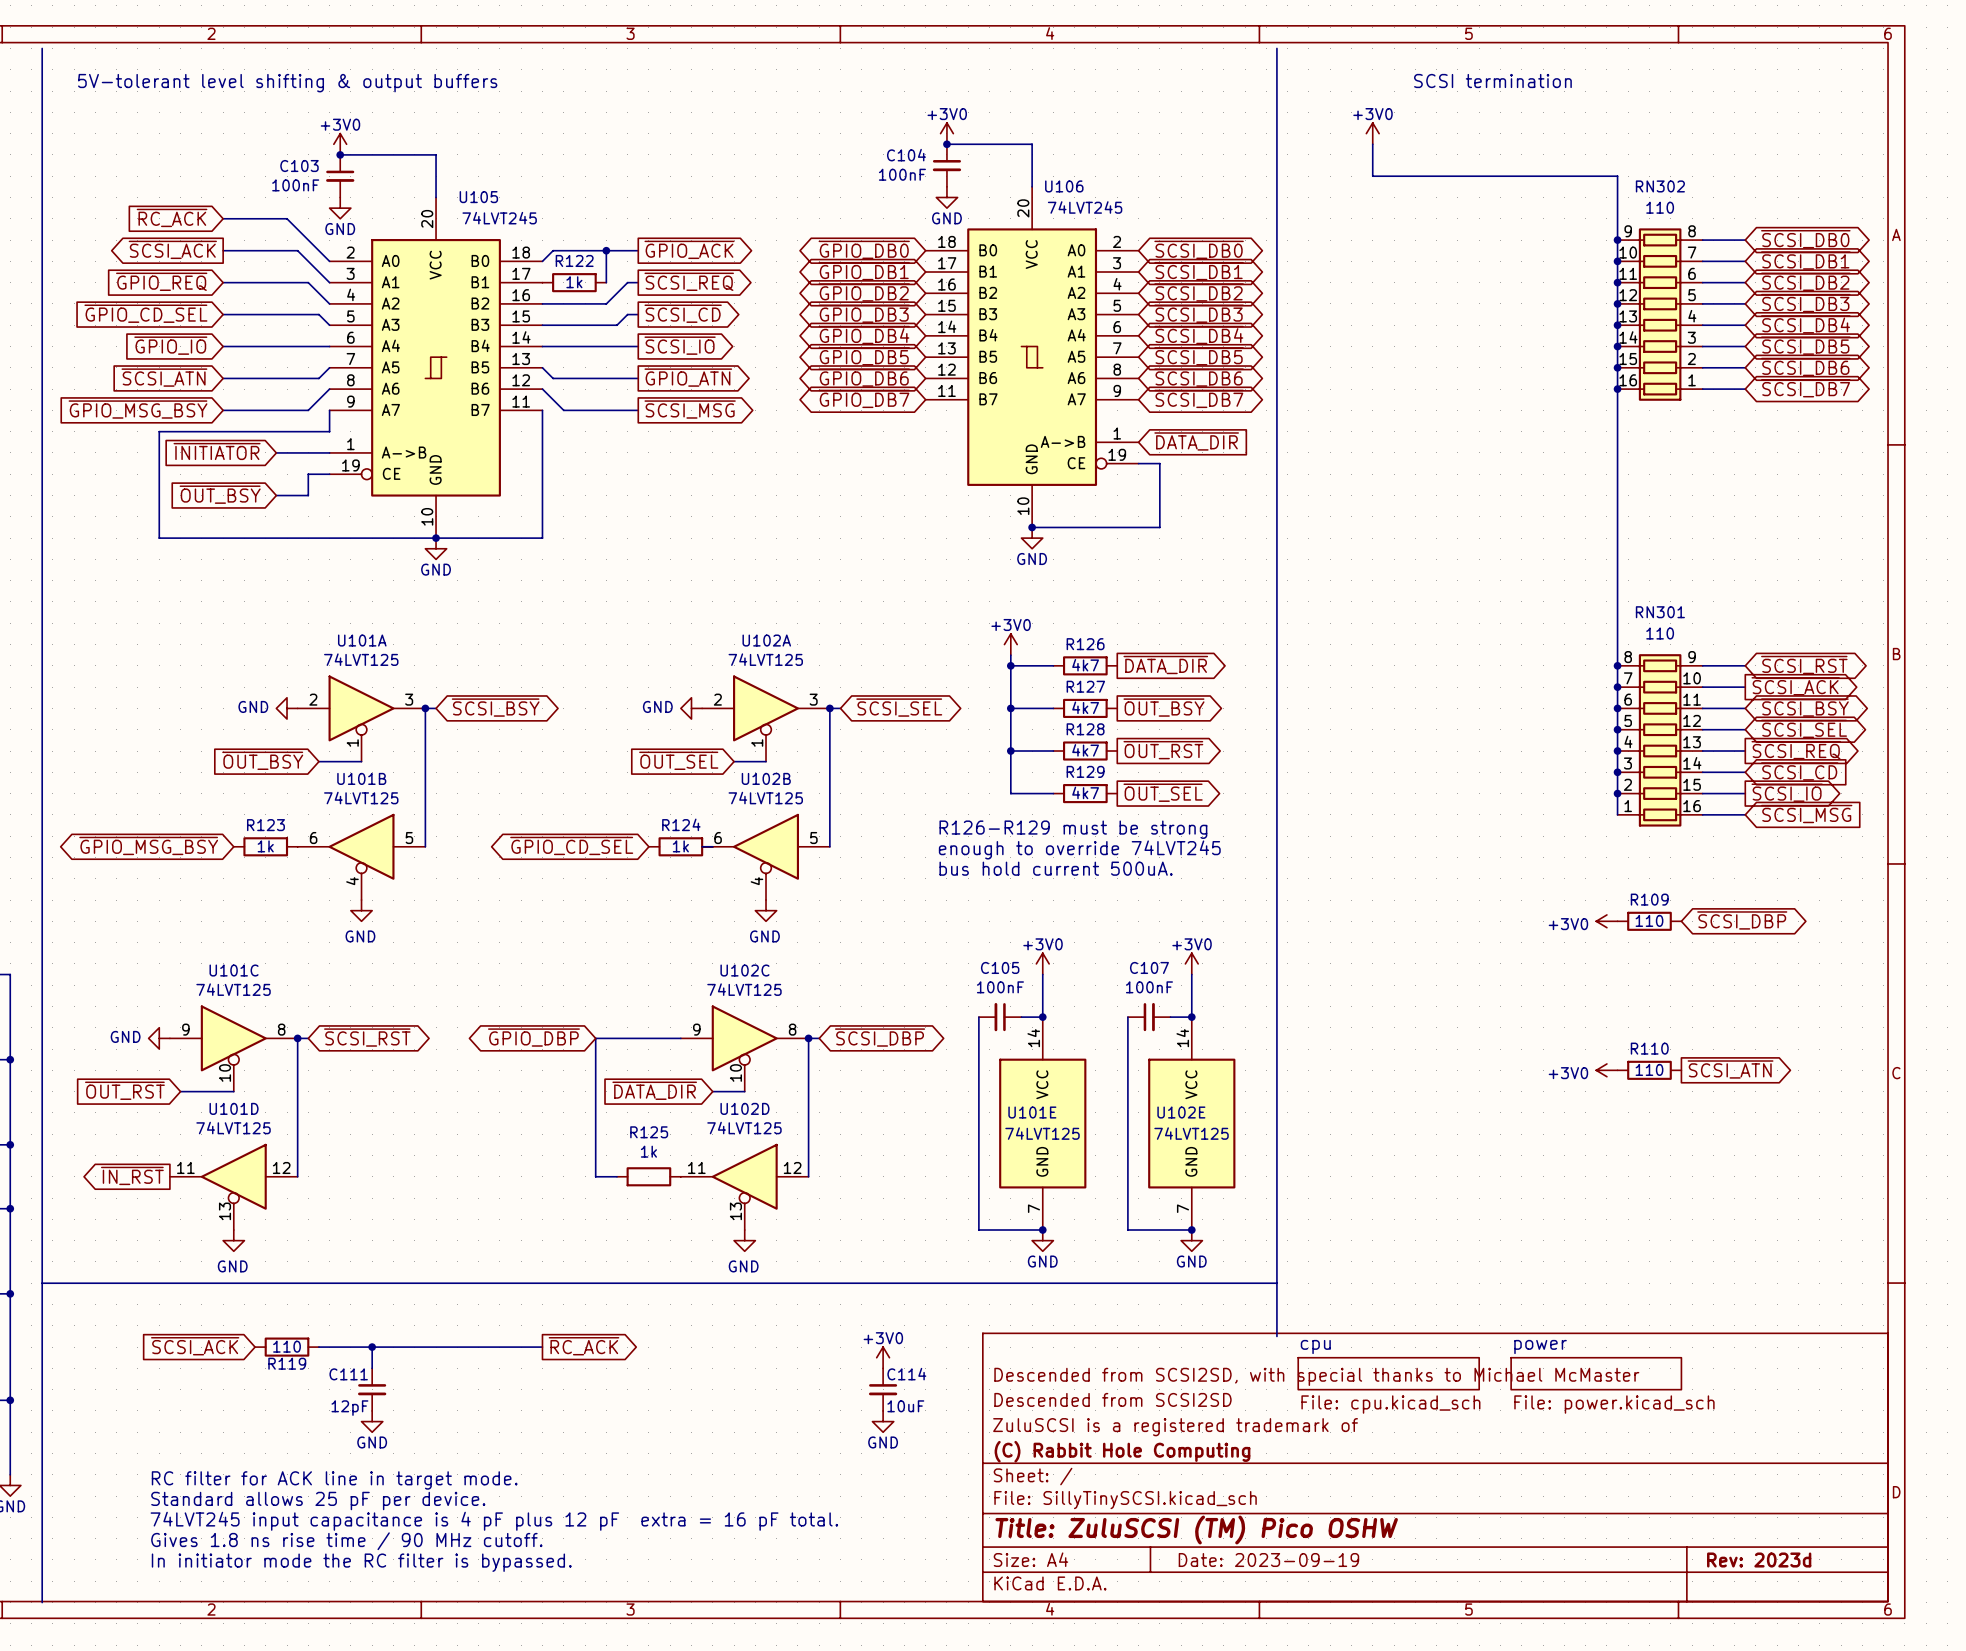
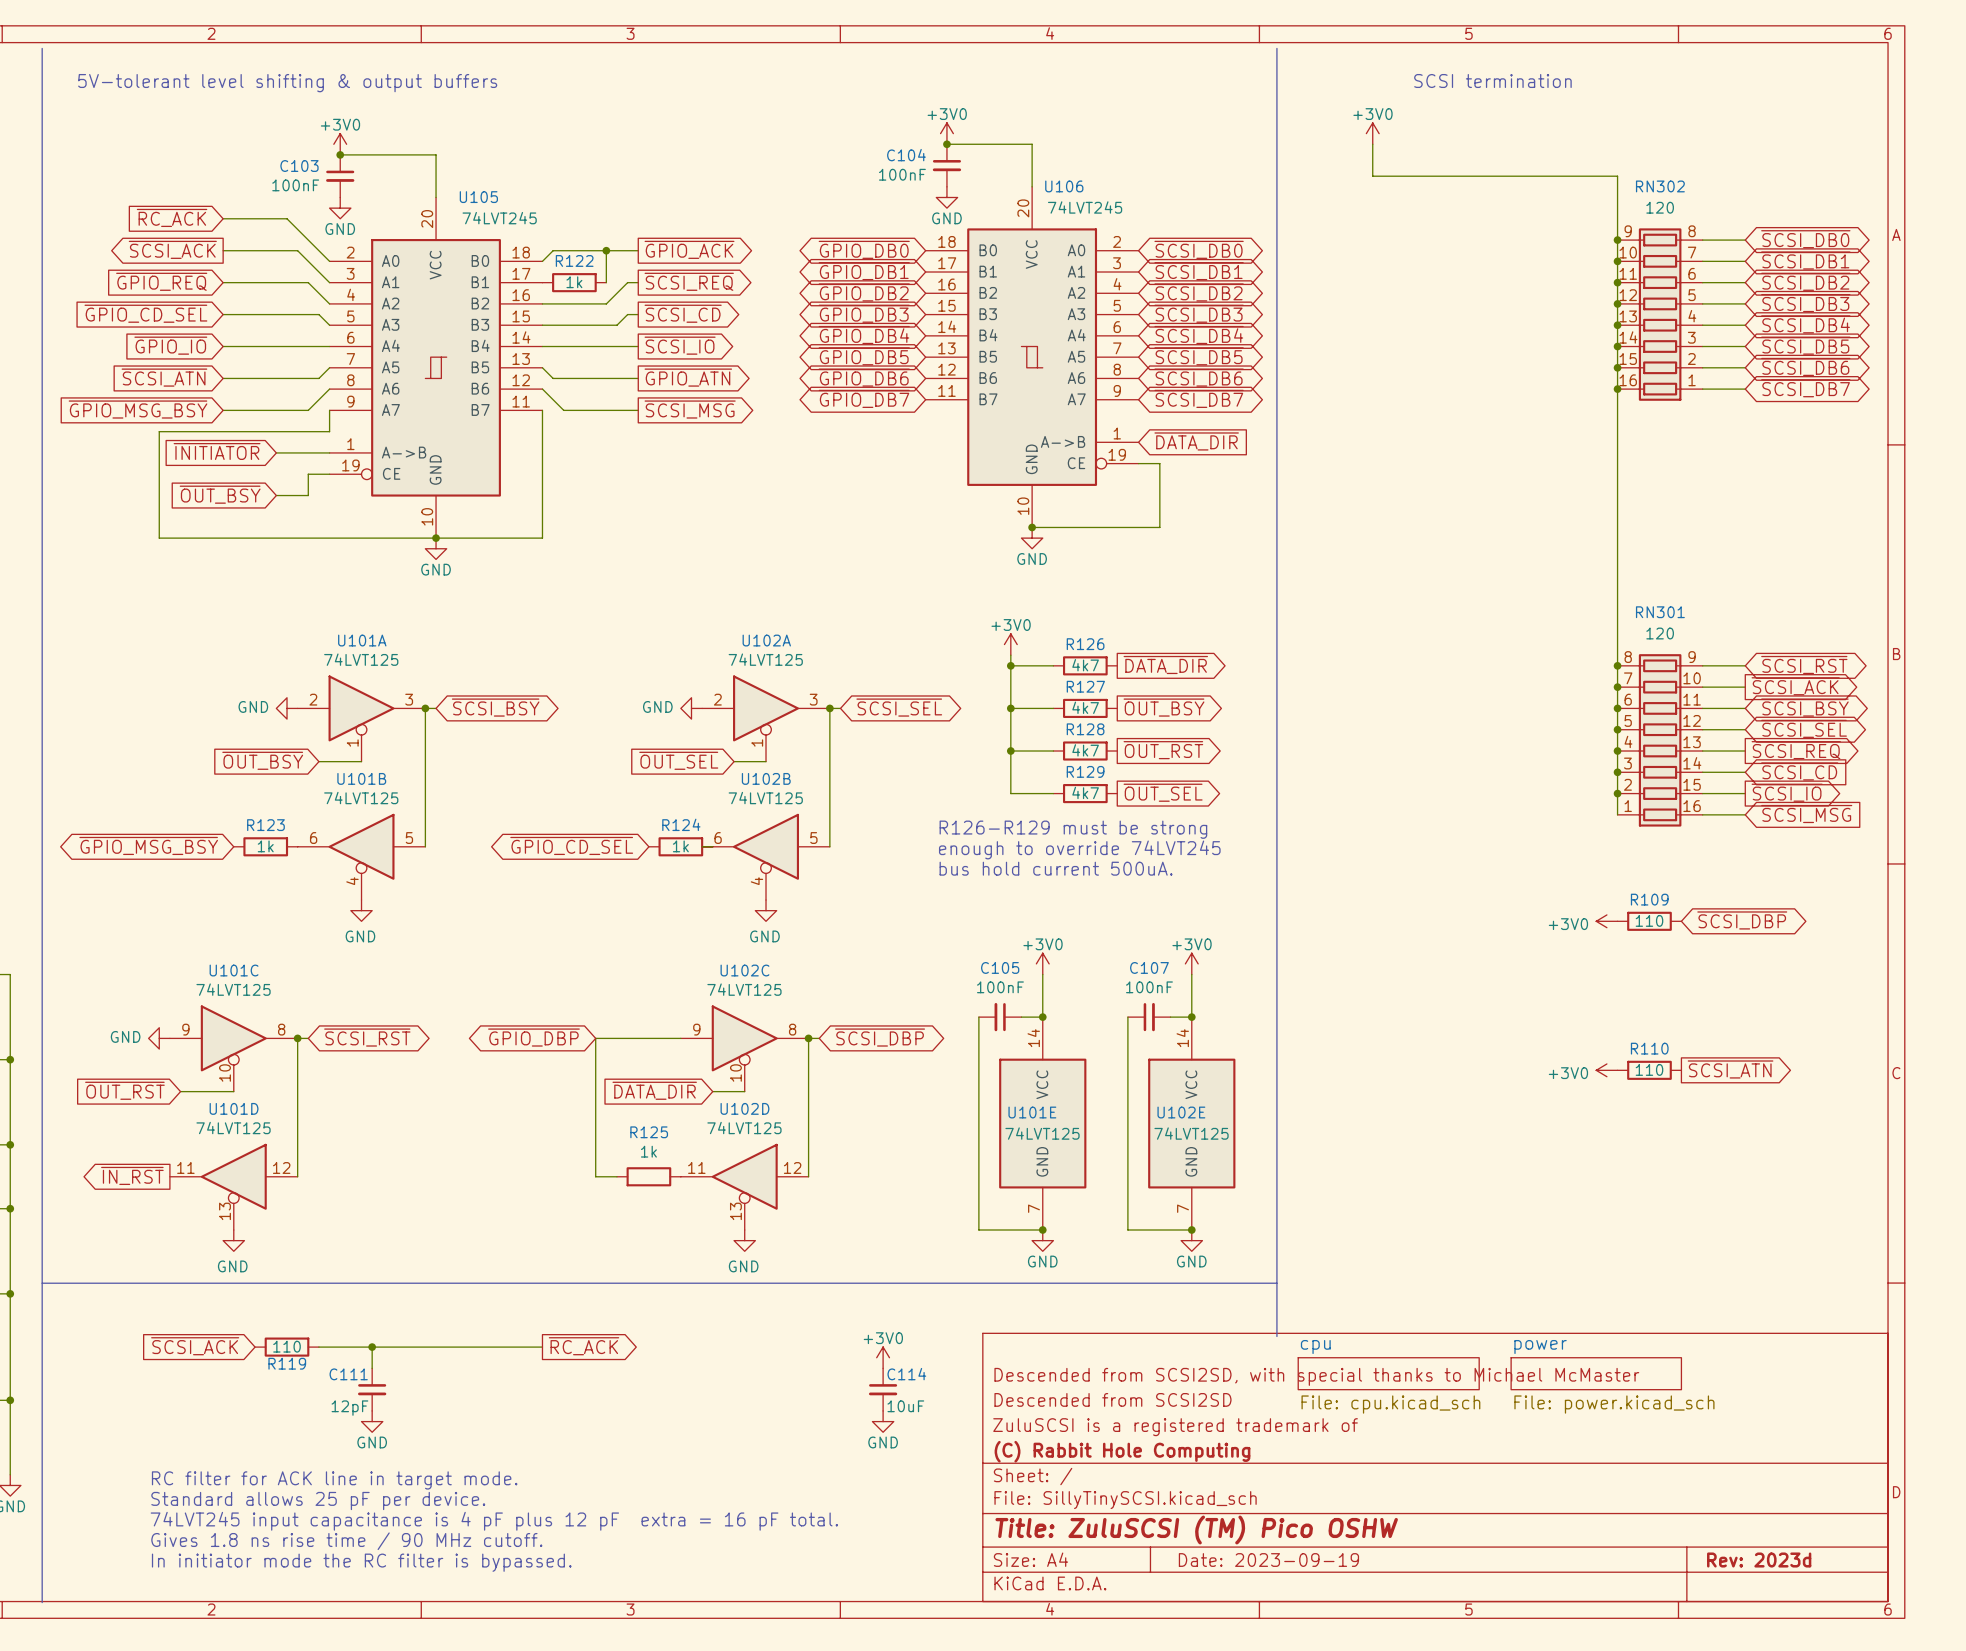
RN302 value: 110 (1660, 207) -> 120 (1660, 207)
RN301 value: 110 (1660, 633) -> 120 (1660, 633)

